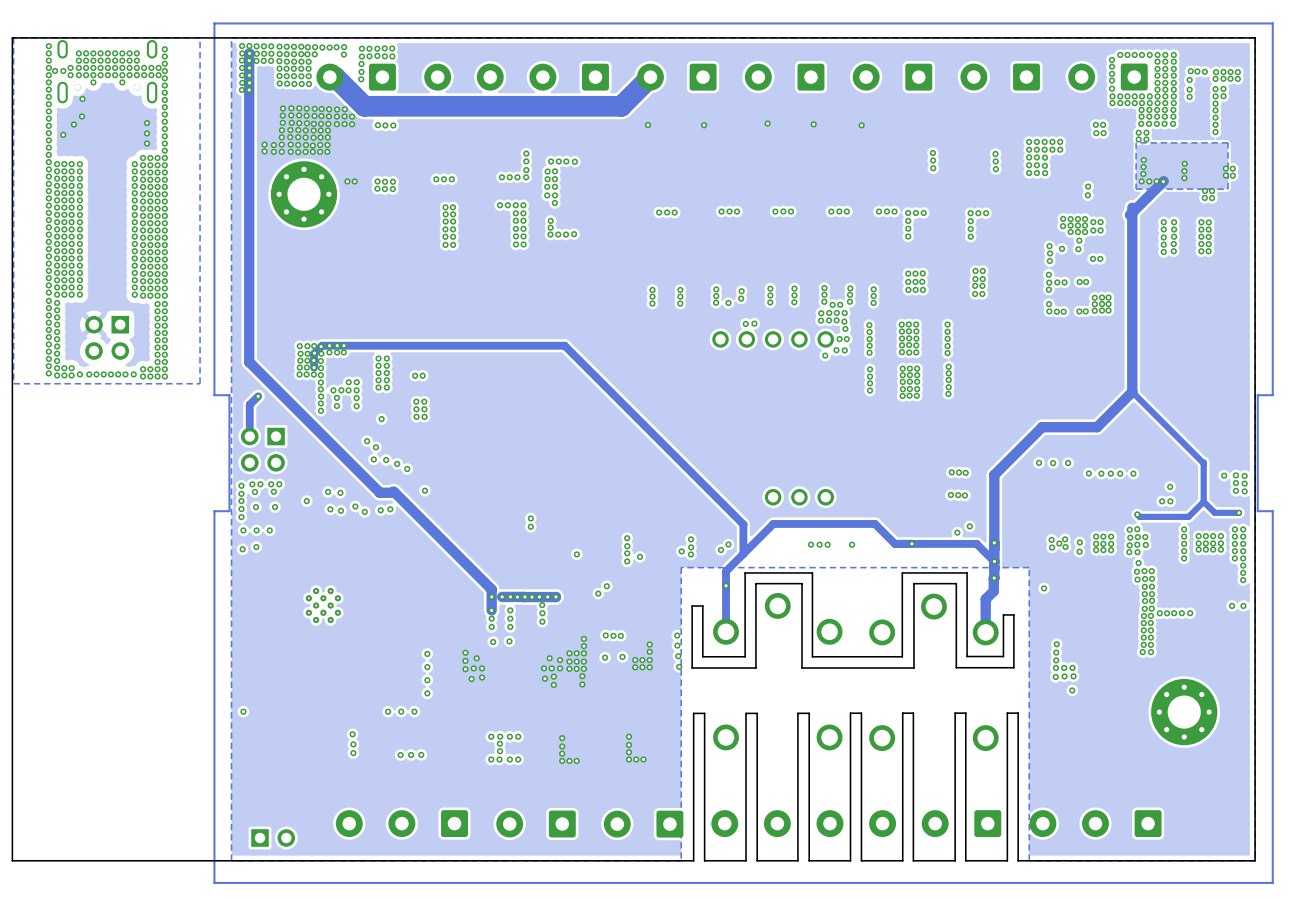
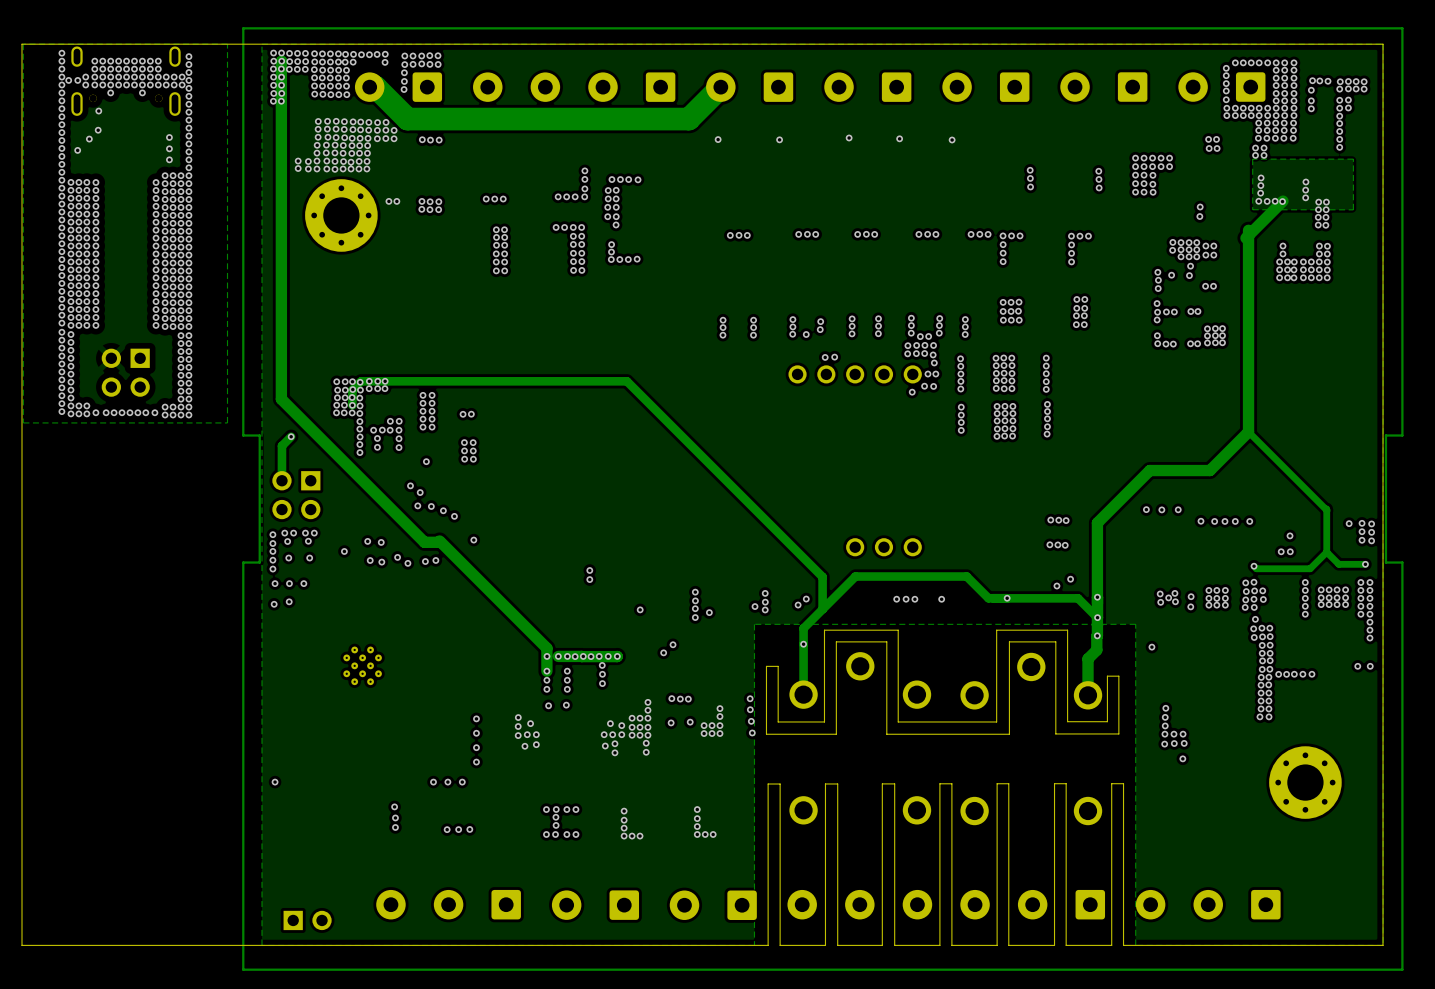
via: (1225, 168) -> none
via: (1232, 168) -> none
via: (1225, 175) -> none
via: (1232, 175) -> none
via: none -> (1318, 202)
via: none -> (1326, 202)
via: none -> (1318, 209)
via: none -> (1326, 209)
via: (1205, 191) -> none
via: (1212, 191) -> none
via: none -> (1318, 217)
via: none -> (1325, 217)
via: (1204, 197) -> none
via: (1212, 198) -> none
via: none -> (1318, 225)
via: none -> (1325, 225)
via: (1174, 222) -> none
via: none -> (1319, 246)
via: (1201, 222) -> none
via: none -> (1327, 246)
via: (1208, 222) -> none
via: (1174, 229) -> none
via: none -> (1319, 254)
via: (1201, 229) -> none
via: none -> (1327, 254)
via: (1208, 229) -> none
via: none -> (1279, 261)
via: none -> (1287, 261)
via: none -> (1303, 261)
via: none -> (1311, 261)
via: none -> (1319, 261)
via: (1201, 236) -> none
via: none -> (1327, 262)
via: (1208, 236) -> none
via: (1163, 237) -> none
via: none -> (1279, 269)
via: none -> (1287, 269)
via: none -> (1303, 269)
via: none -> (1311, 269)
via: none -> (1319, 269)
via: (1163, 244) -> none
via: (1201, 244) -> none
via: none -> (1327, 270)
via: (1208, 244) -> none
via: none -> (1279, 277)
via: (1163, 251) -> none
via: none -> (1287, 277)
via: none -> (1303, 277)
via: none -> (1311, 277)
via: none -> (1319, 277)
via: (1201, 251) -> none
via: none -> (1327, 277)
via: (1208, 251) -> none

